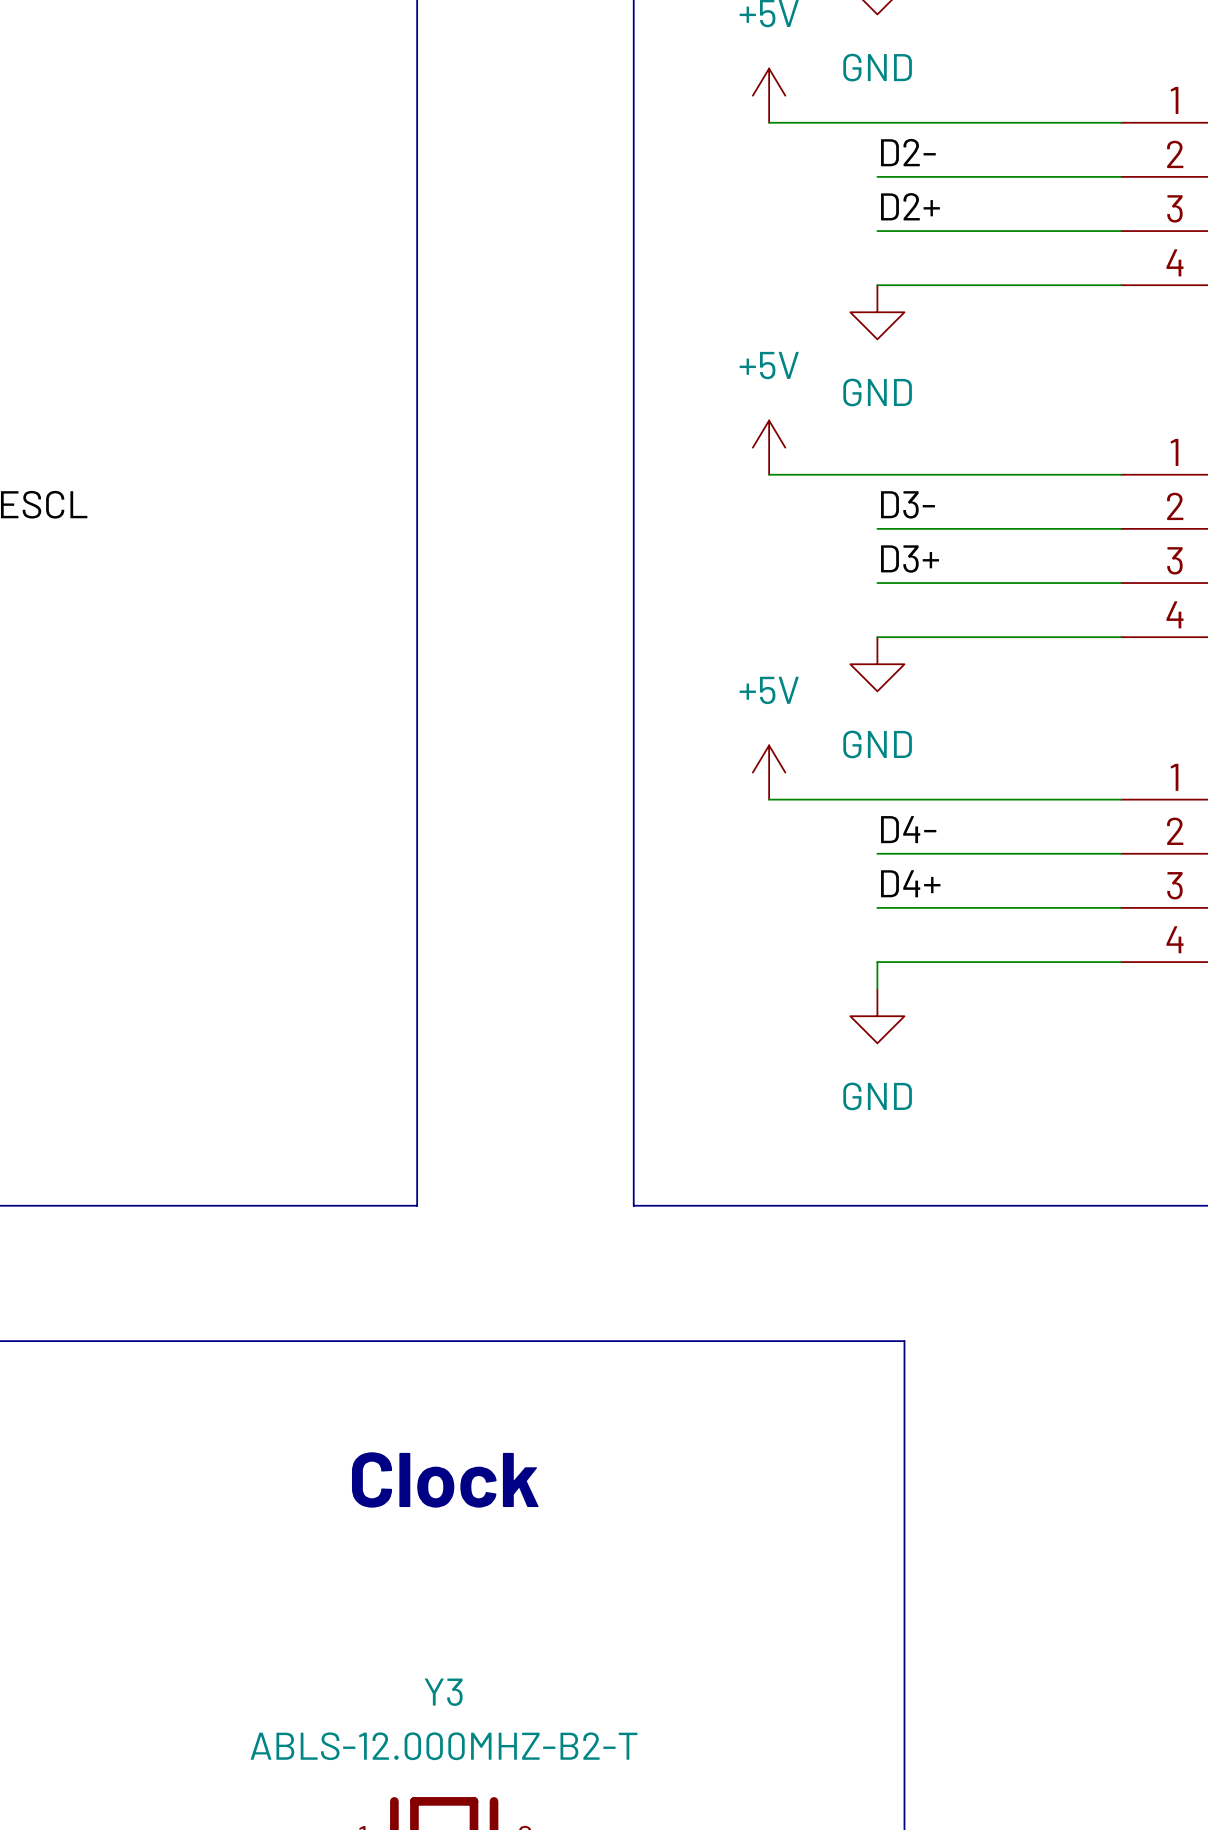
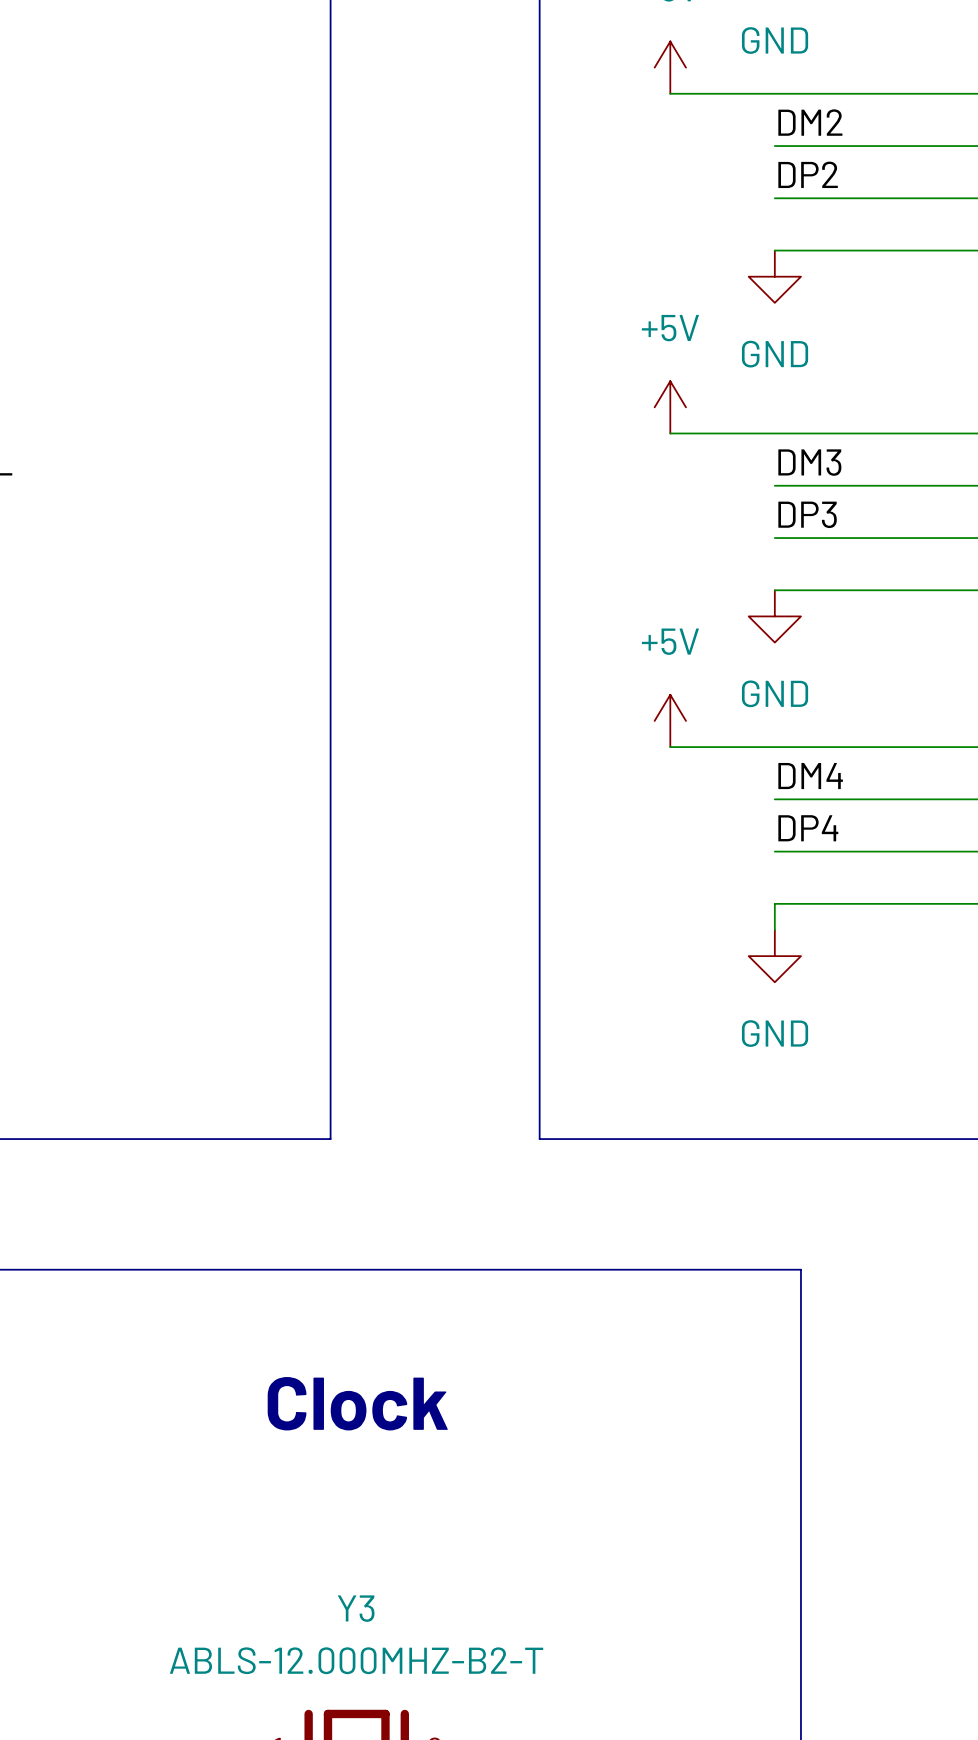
label: D2- (908, 152) -> DM2 (810, 122)
label: D2+ (910, 206) -> DP2 (808, 174)
label: D3- (908, 504) -> DM3 (809, 462)
label: D3+ (910, 559) -> DP3 (807, 514)
label: D4- (908, 829) -> DM4 (810, 776)
label: D4+ (910, 883) -> DP4 (808, 828)

